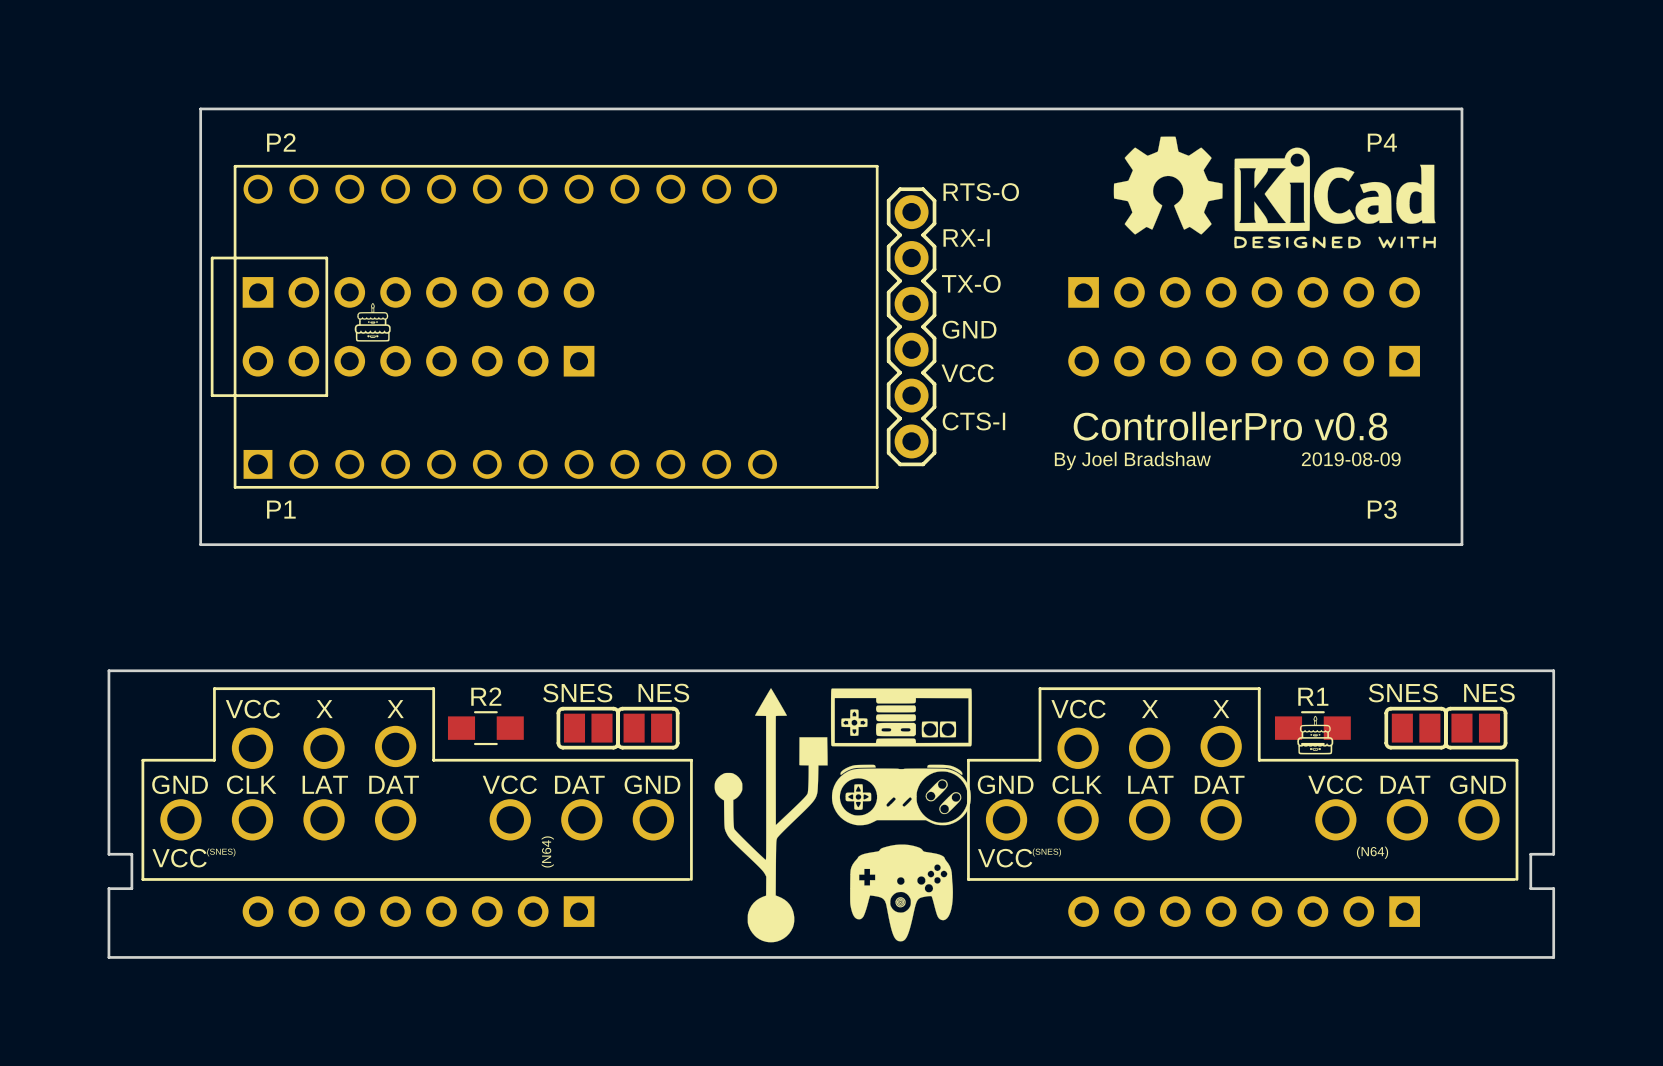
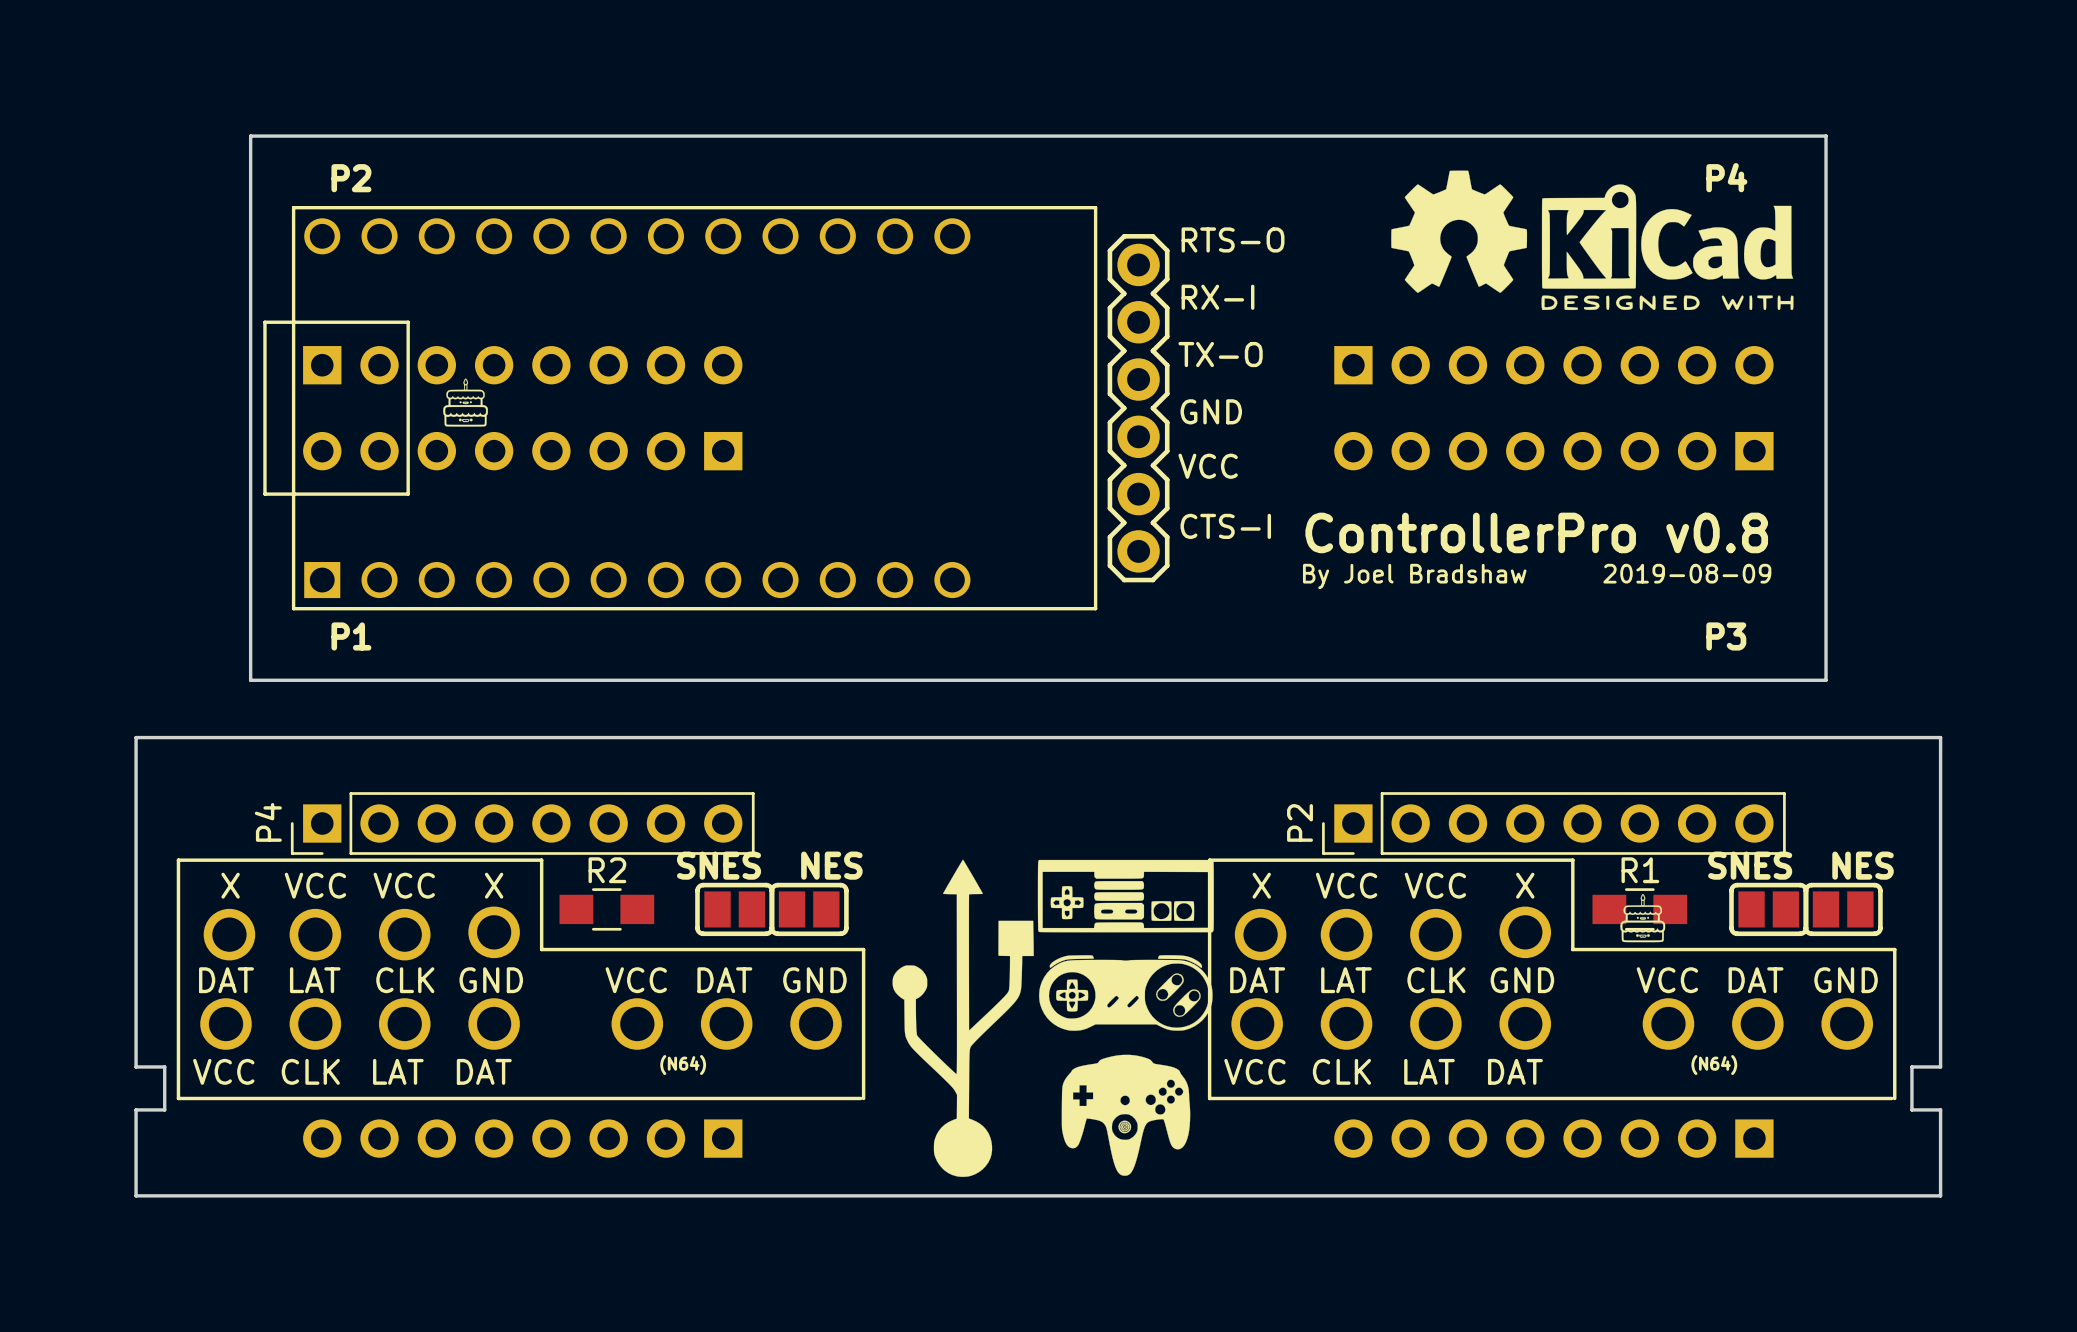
P4: none -> (522, 823)
P2: none -> (1553, 823)
board edge: (108, 670) (1553, 670) -> (136, 837) (136, 737) (1940, 737) (1940, 837)
part footprint: [141, 687, 693, 881] -> [176, 858, 866, 1101]
part footprint: [967, 687, 1519, 881] -> [1207, 858, 1897, 1101]

